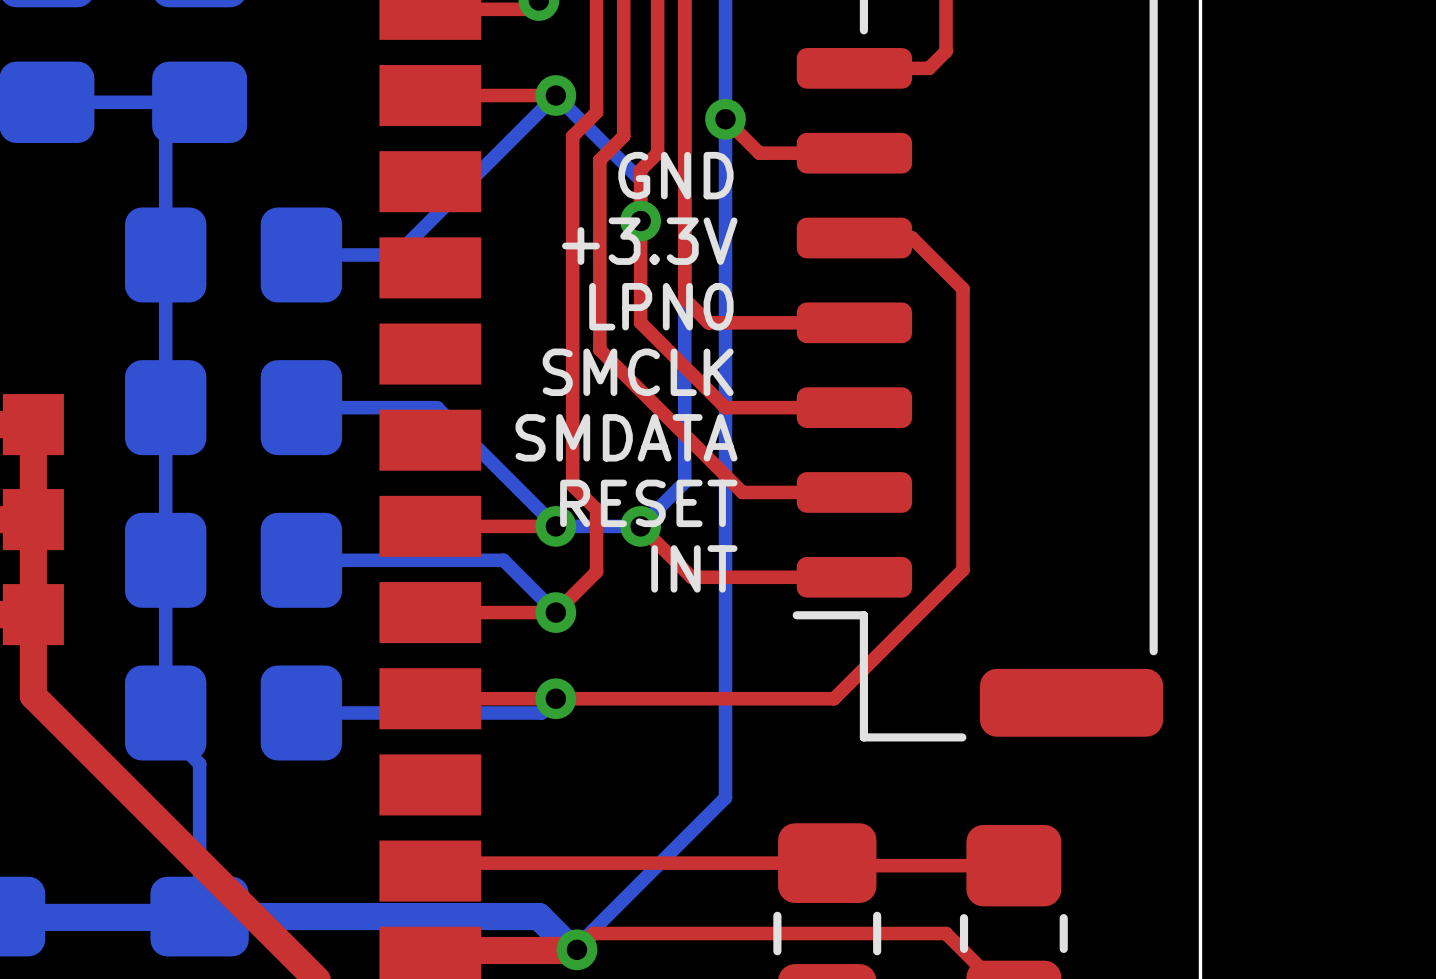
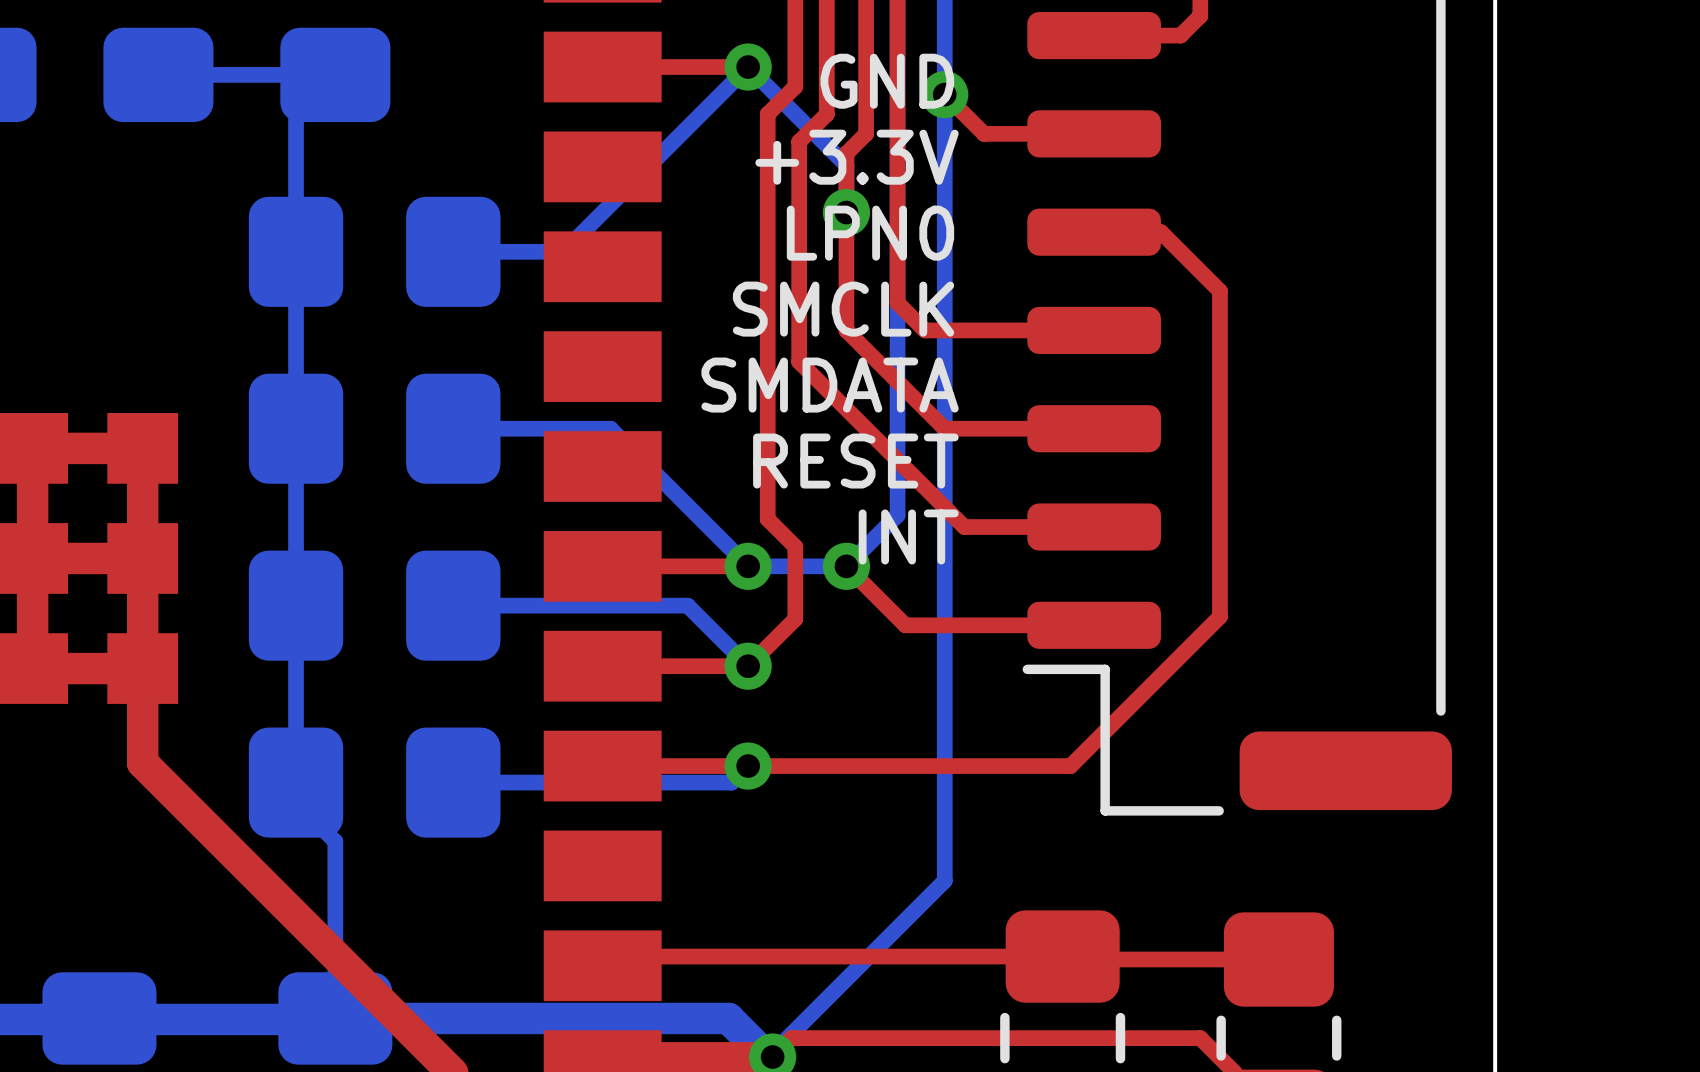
text position: GND (675, 175) -> GND (887, 81)
text position: +3.3V (649, 241) -> +3.3V (857, 157)
text position: LPN0 (661, 306) -> LPN0 (870, 233)
text position: SMCLK (638, 372) -> SMCLK (843, 309)
text position: SMDATA (626, 437) -> SMDATA (830, 385)
text position: RESET (648, 503) -> RESET (855, 461)
text position: INT (694, 568) -> INT (908, 536)

